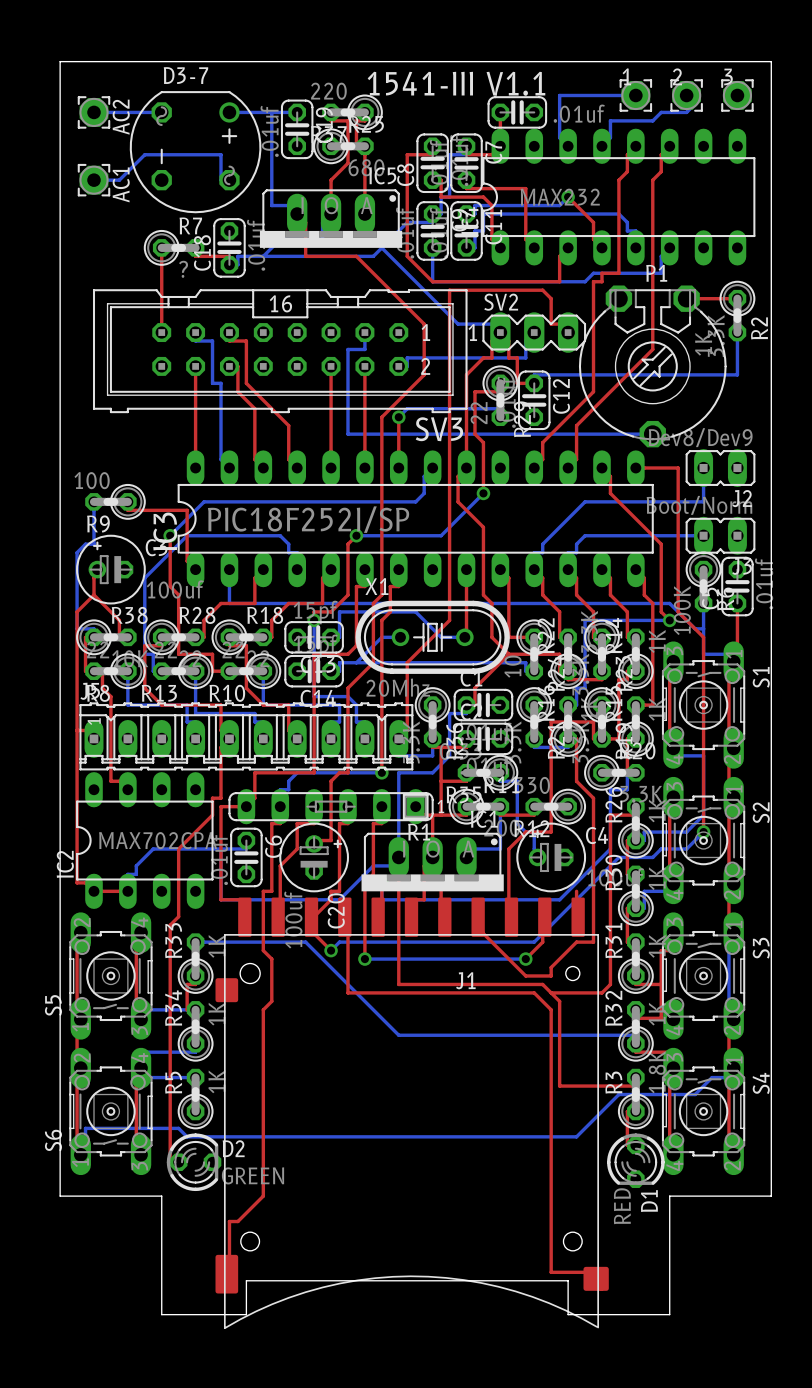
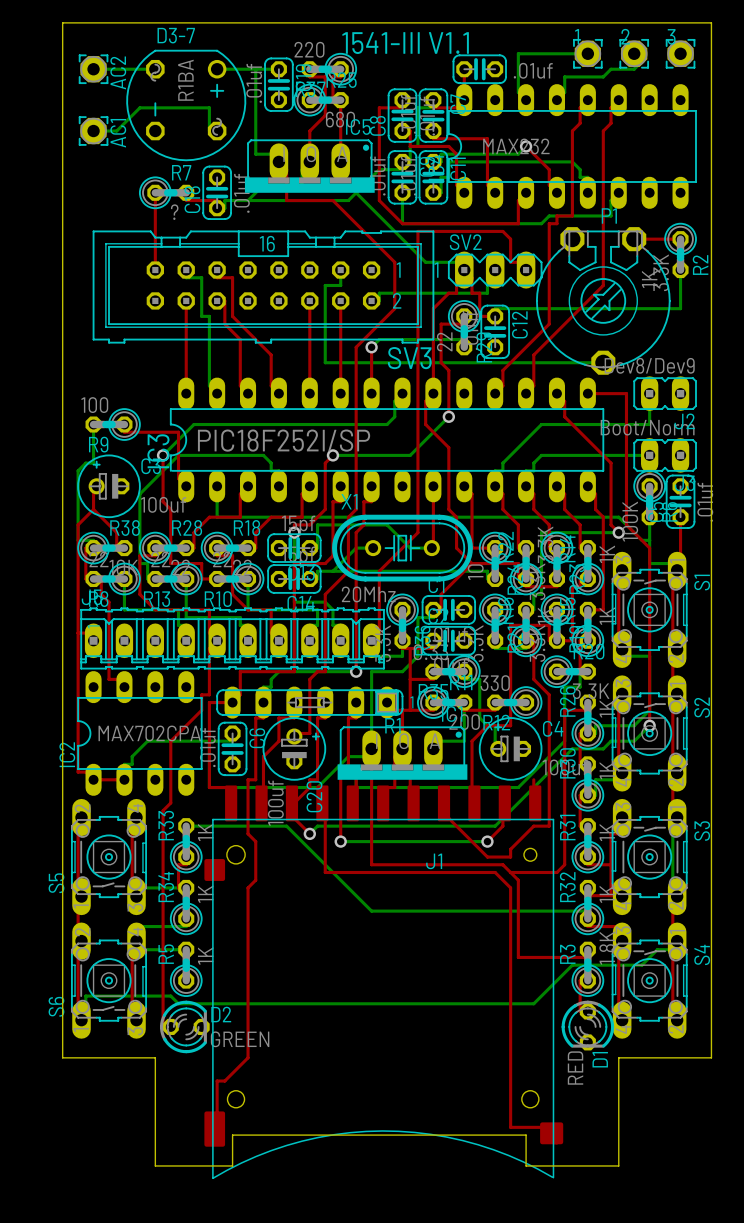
D3-7 value: none -> R1BA (185, 80)

